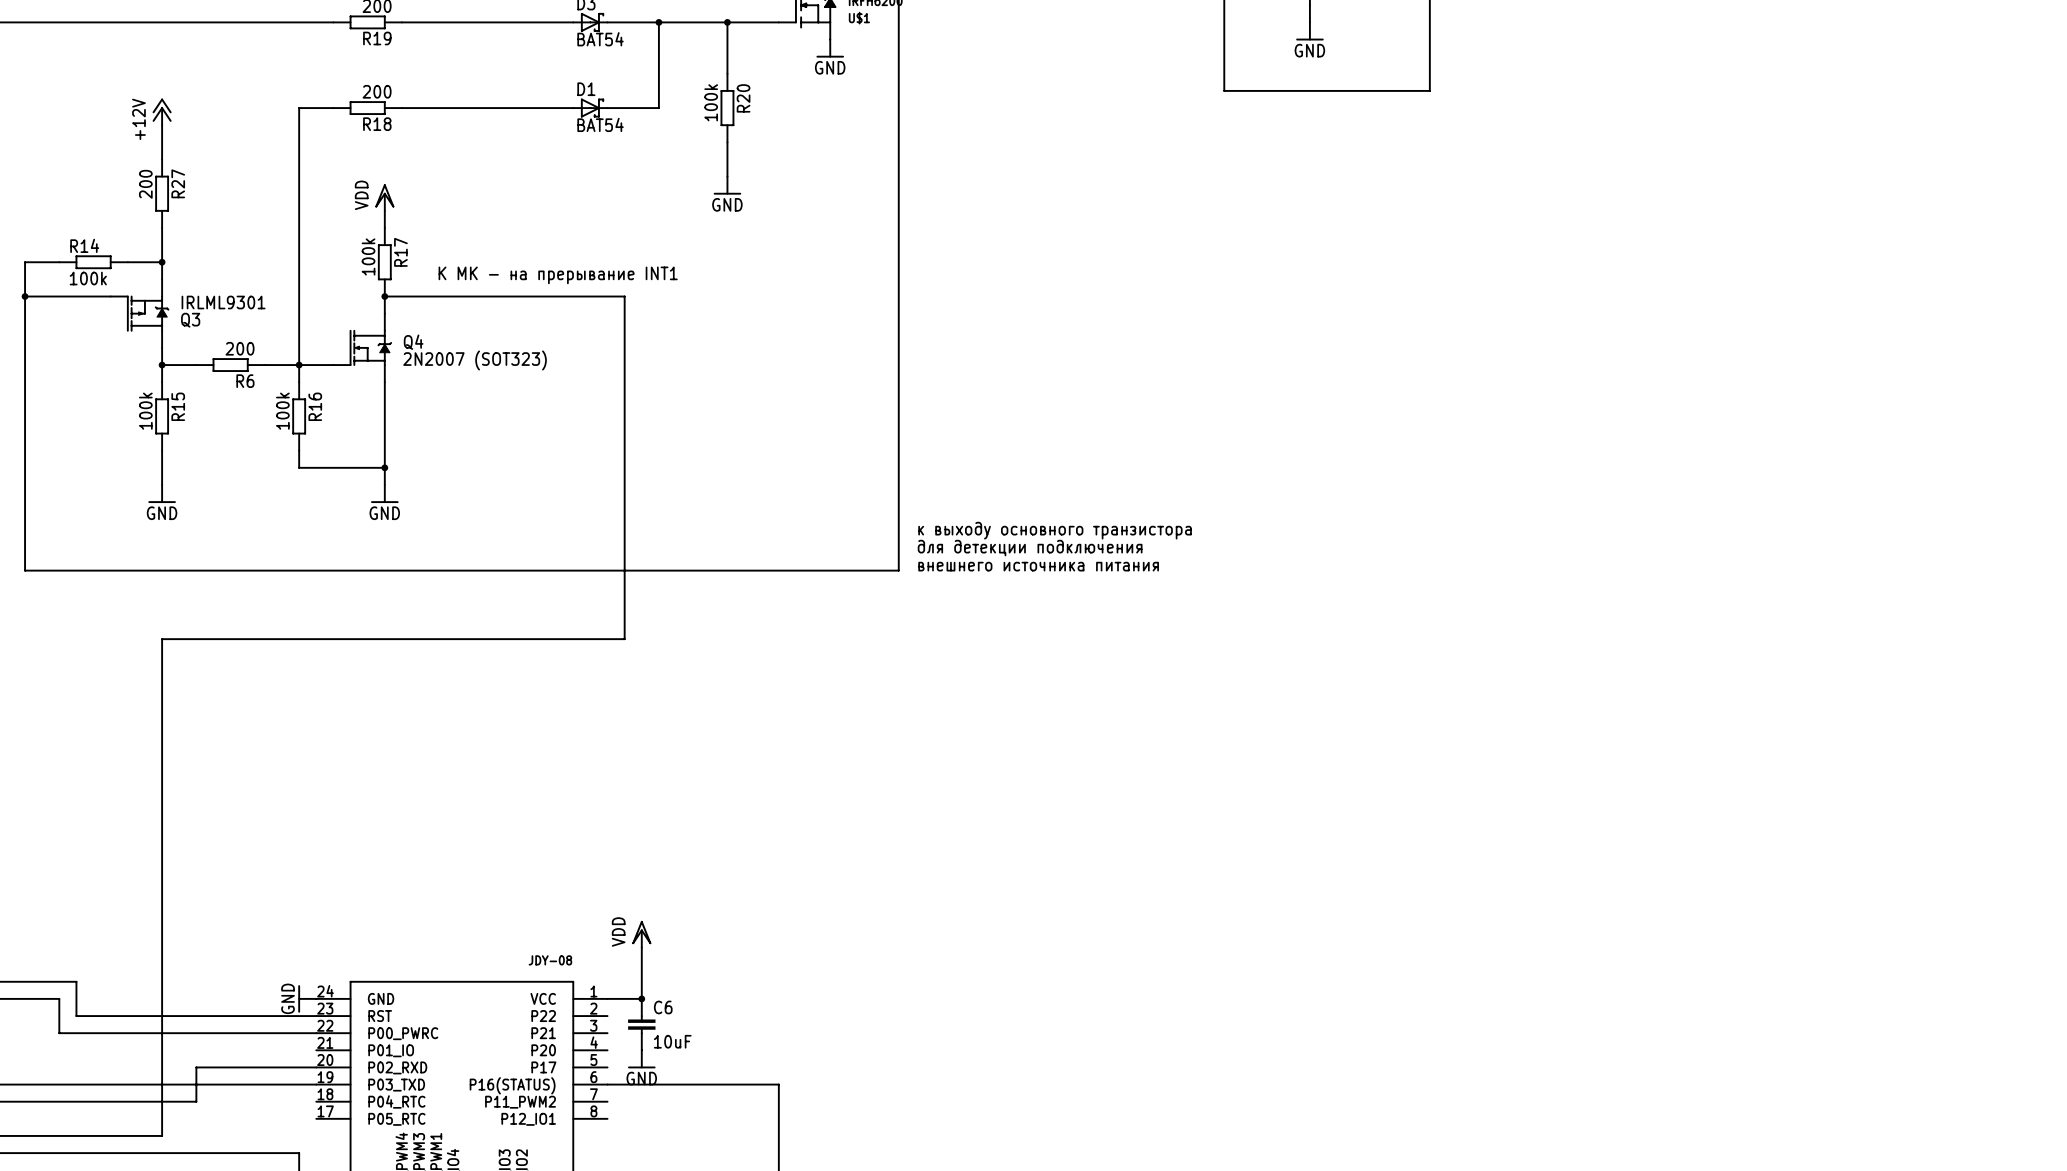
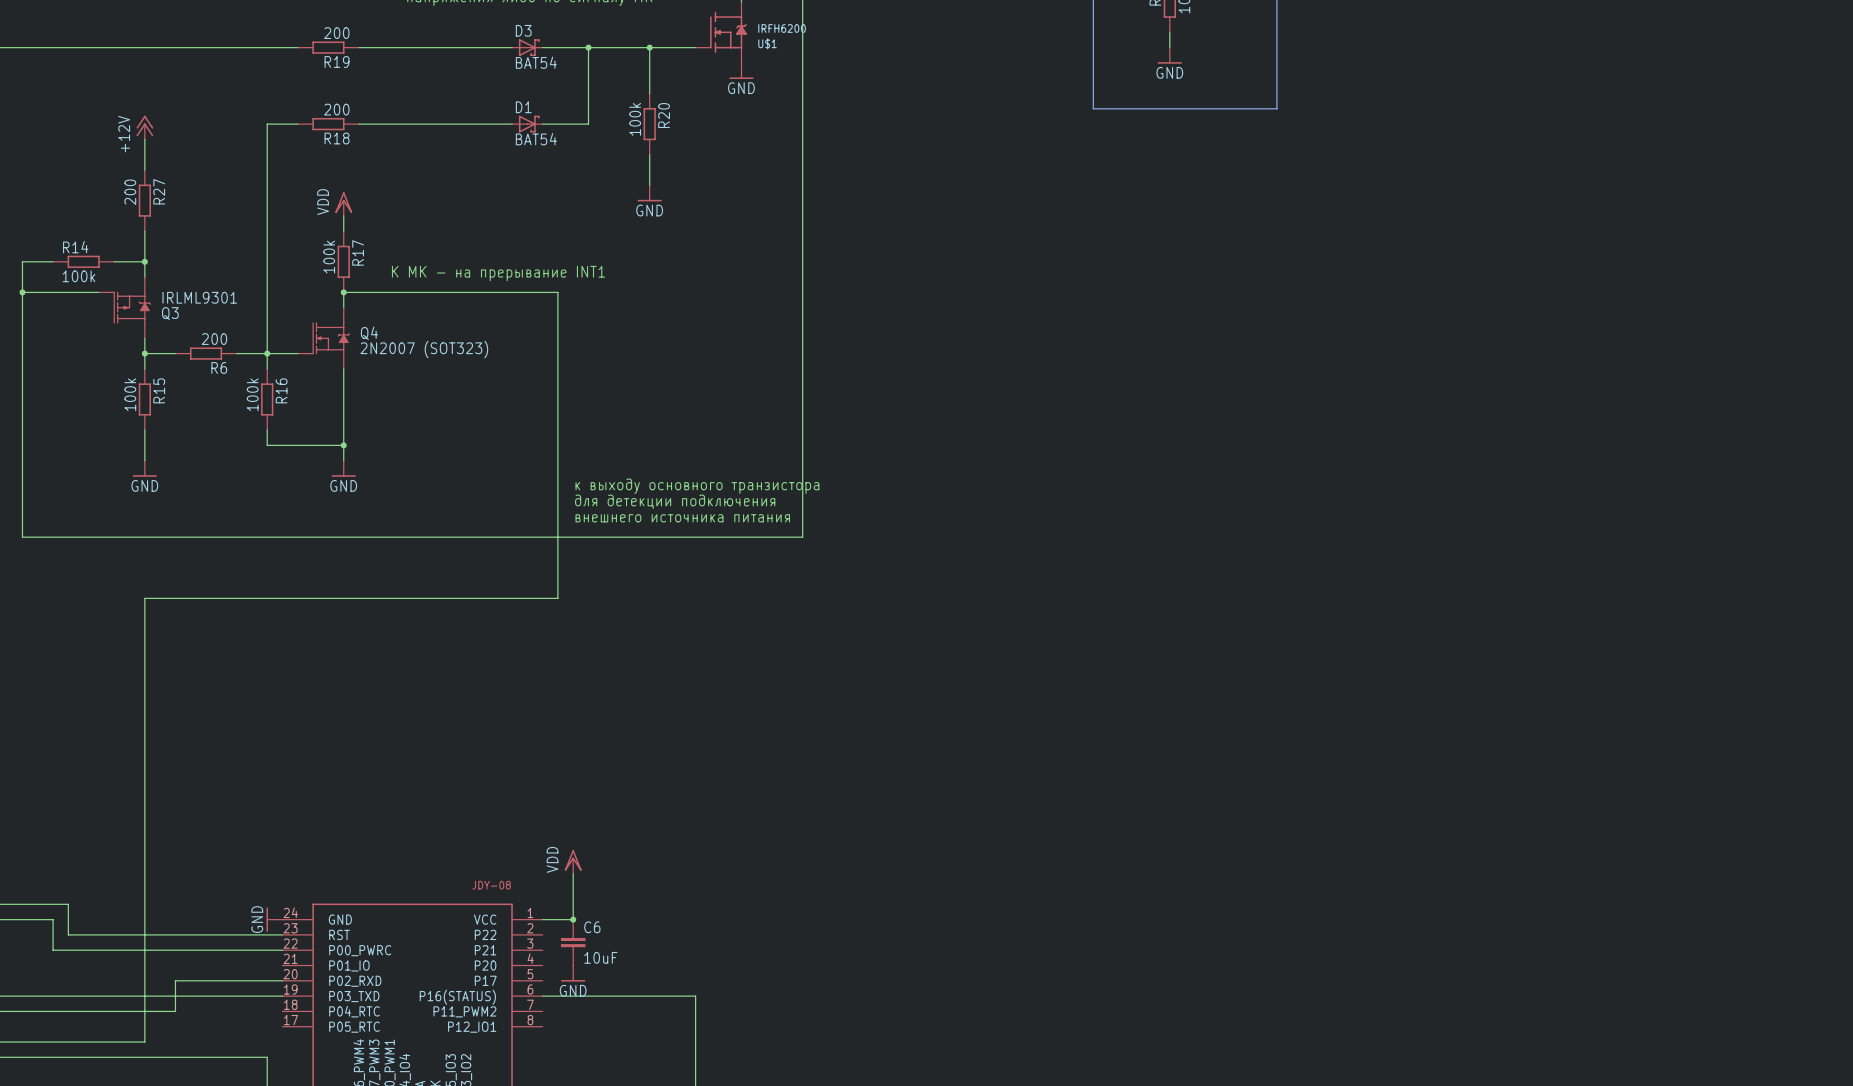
text: none -> к выходу основного транзистора (697, 486)
text: none -> для детекции подключения (675, 501)
text: к выходу основного транзистора (1055, 530) -> none
text: для детекции подключения (1030, 548) -> none
text: none -> внешнего источника питания (682, 518)
text: внешнего источника питания (1038, 566) -> none

